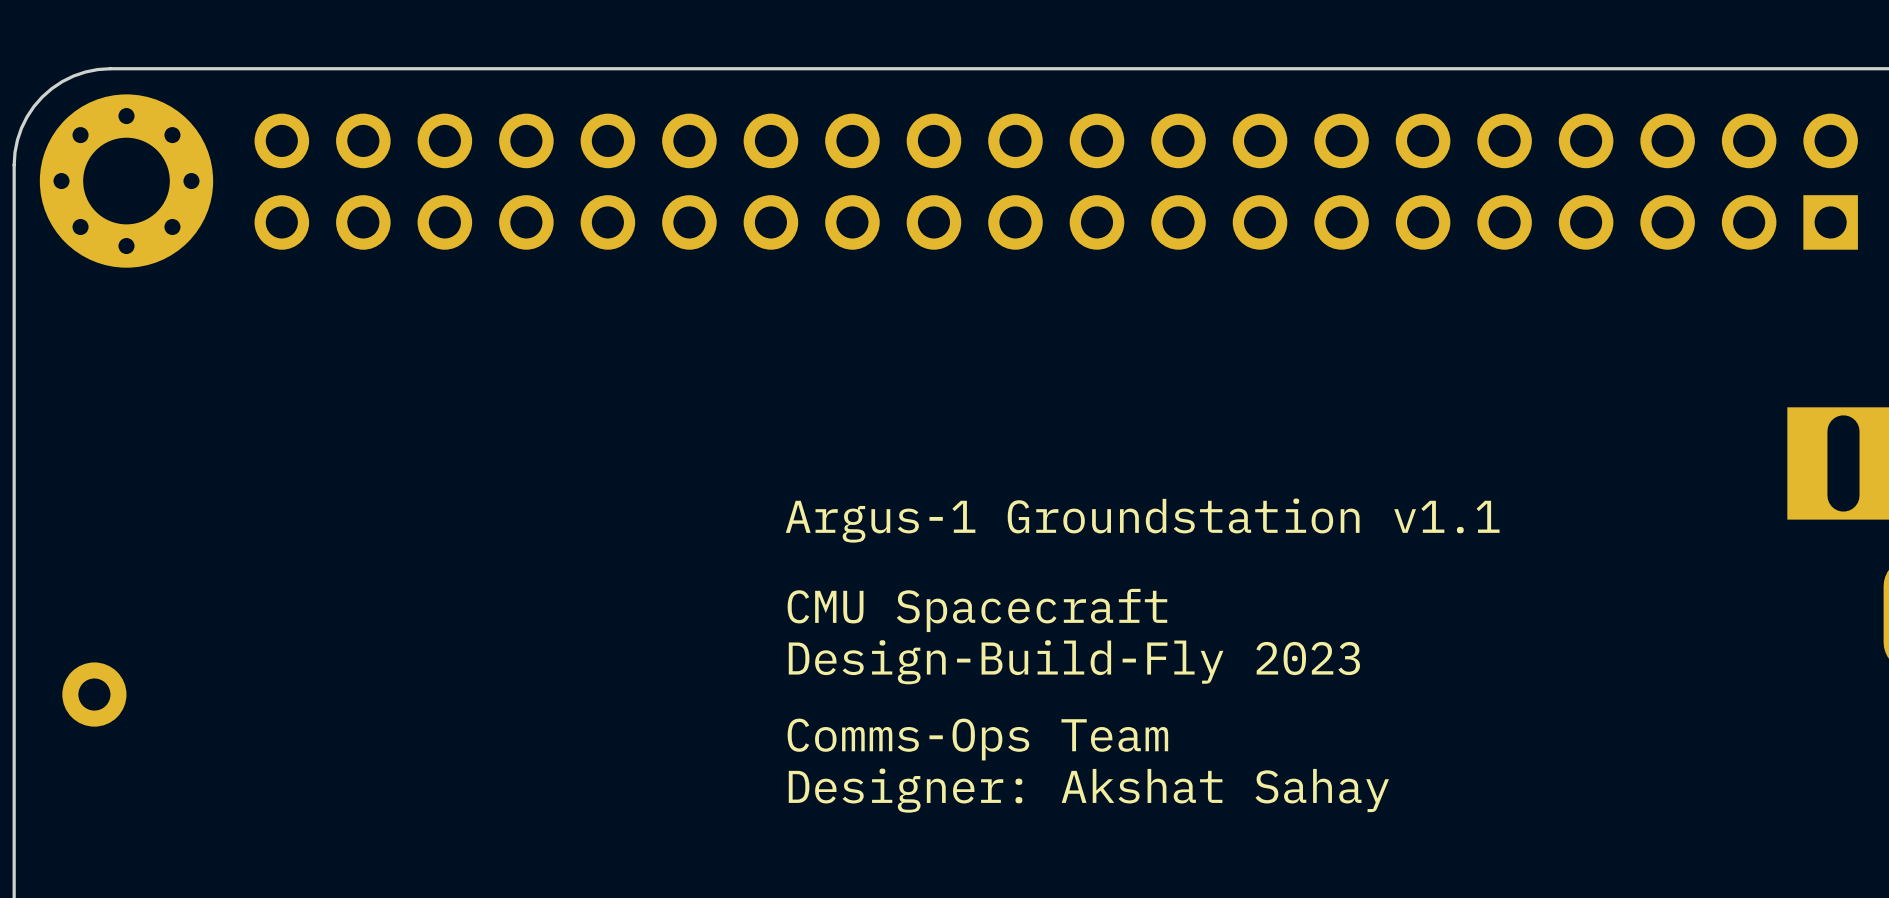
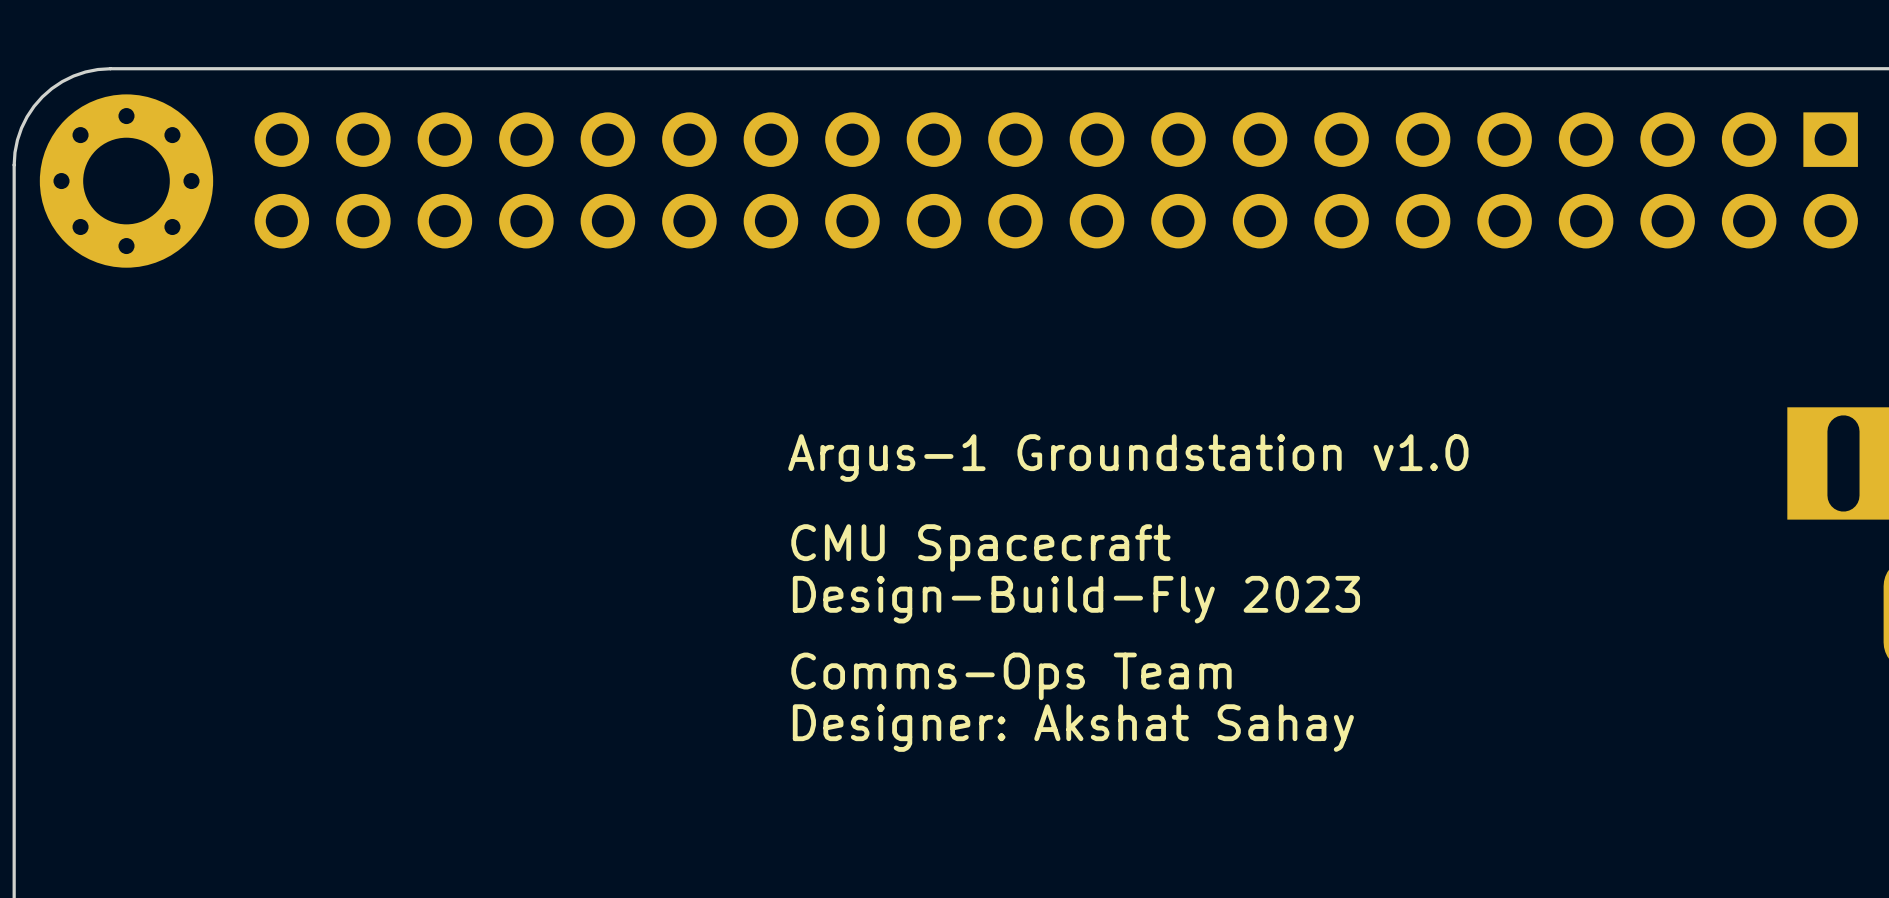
part footprint: [254, 113, 1858, 250] -> [254, 112, 1858, 249]
text: Argus-1 Groundstation v1.1 (1142, 520) -> Argus-1 Groundstation v1.0 (1128, 457)
text position: CMU Spacecraft (977, 610) -> CMU Spacecraft (980, 548)
text position: Design-Build-Fly 2023 (1074, 662) -> Design-Build-Fly 2023 (1076, 599)
part: (94, 694) -> none
text position: Comms-Ops Team (977, 739) -> Comms-Ops Team (1011, 676)
text position: Designer: Akshat Sahay (1088, 790) -> Designer: Akshat Sahay (1073, 728)

